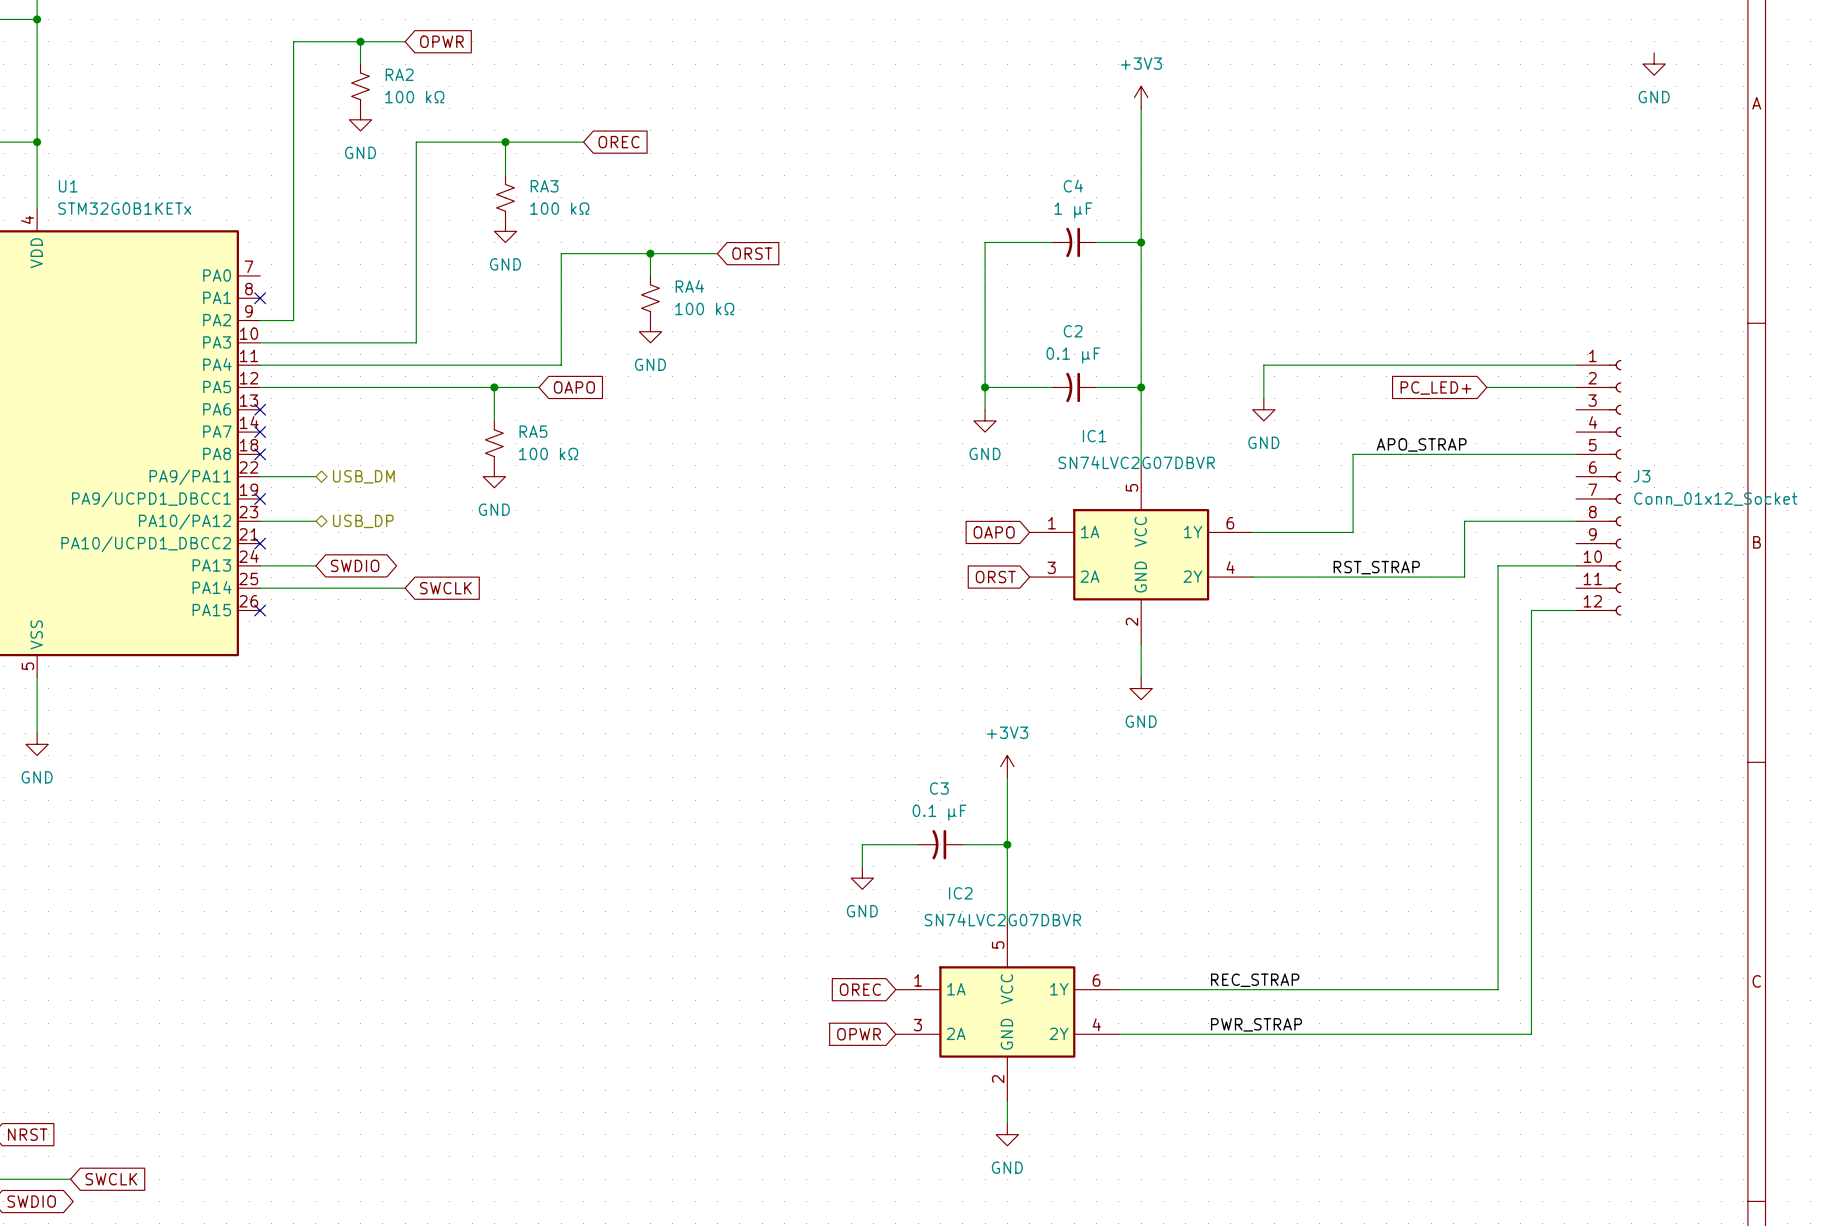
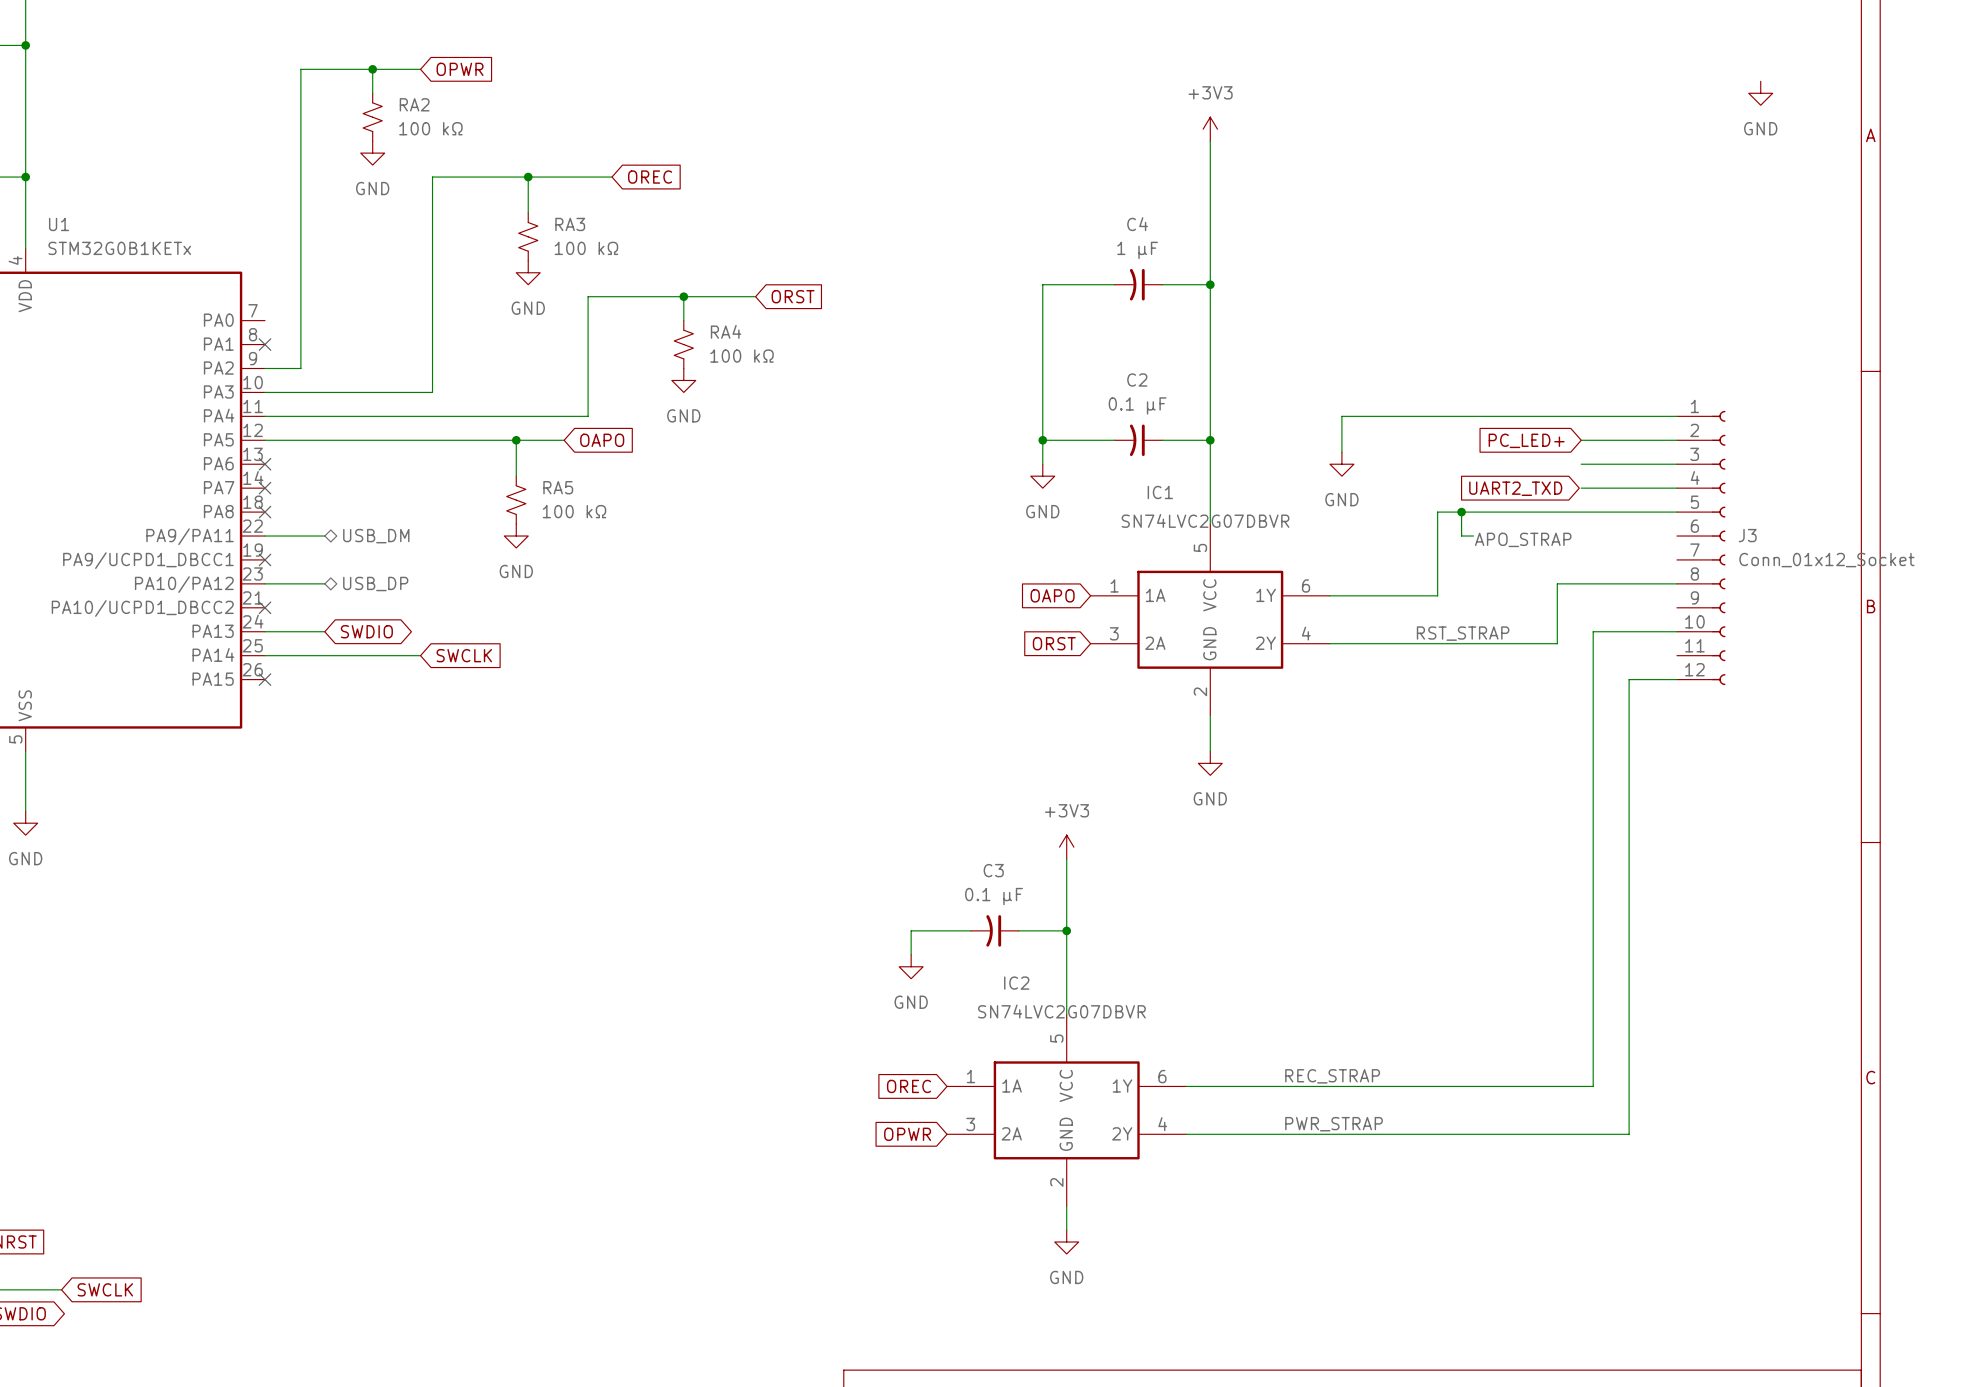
wire: none -> (1581, 464) (1676, 464)
global label: none -> UART2_TXD (1515, 488)
wire: none -> (1581, 488) (1676, 488)
label position: APO_STRAP (1421, 444) -> APO_STRAP (1523, 539)
wire: none -> (1461, 512) (1461, 536) (1473, 536)
junction: none -> (1461, 512)

